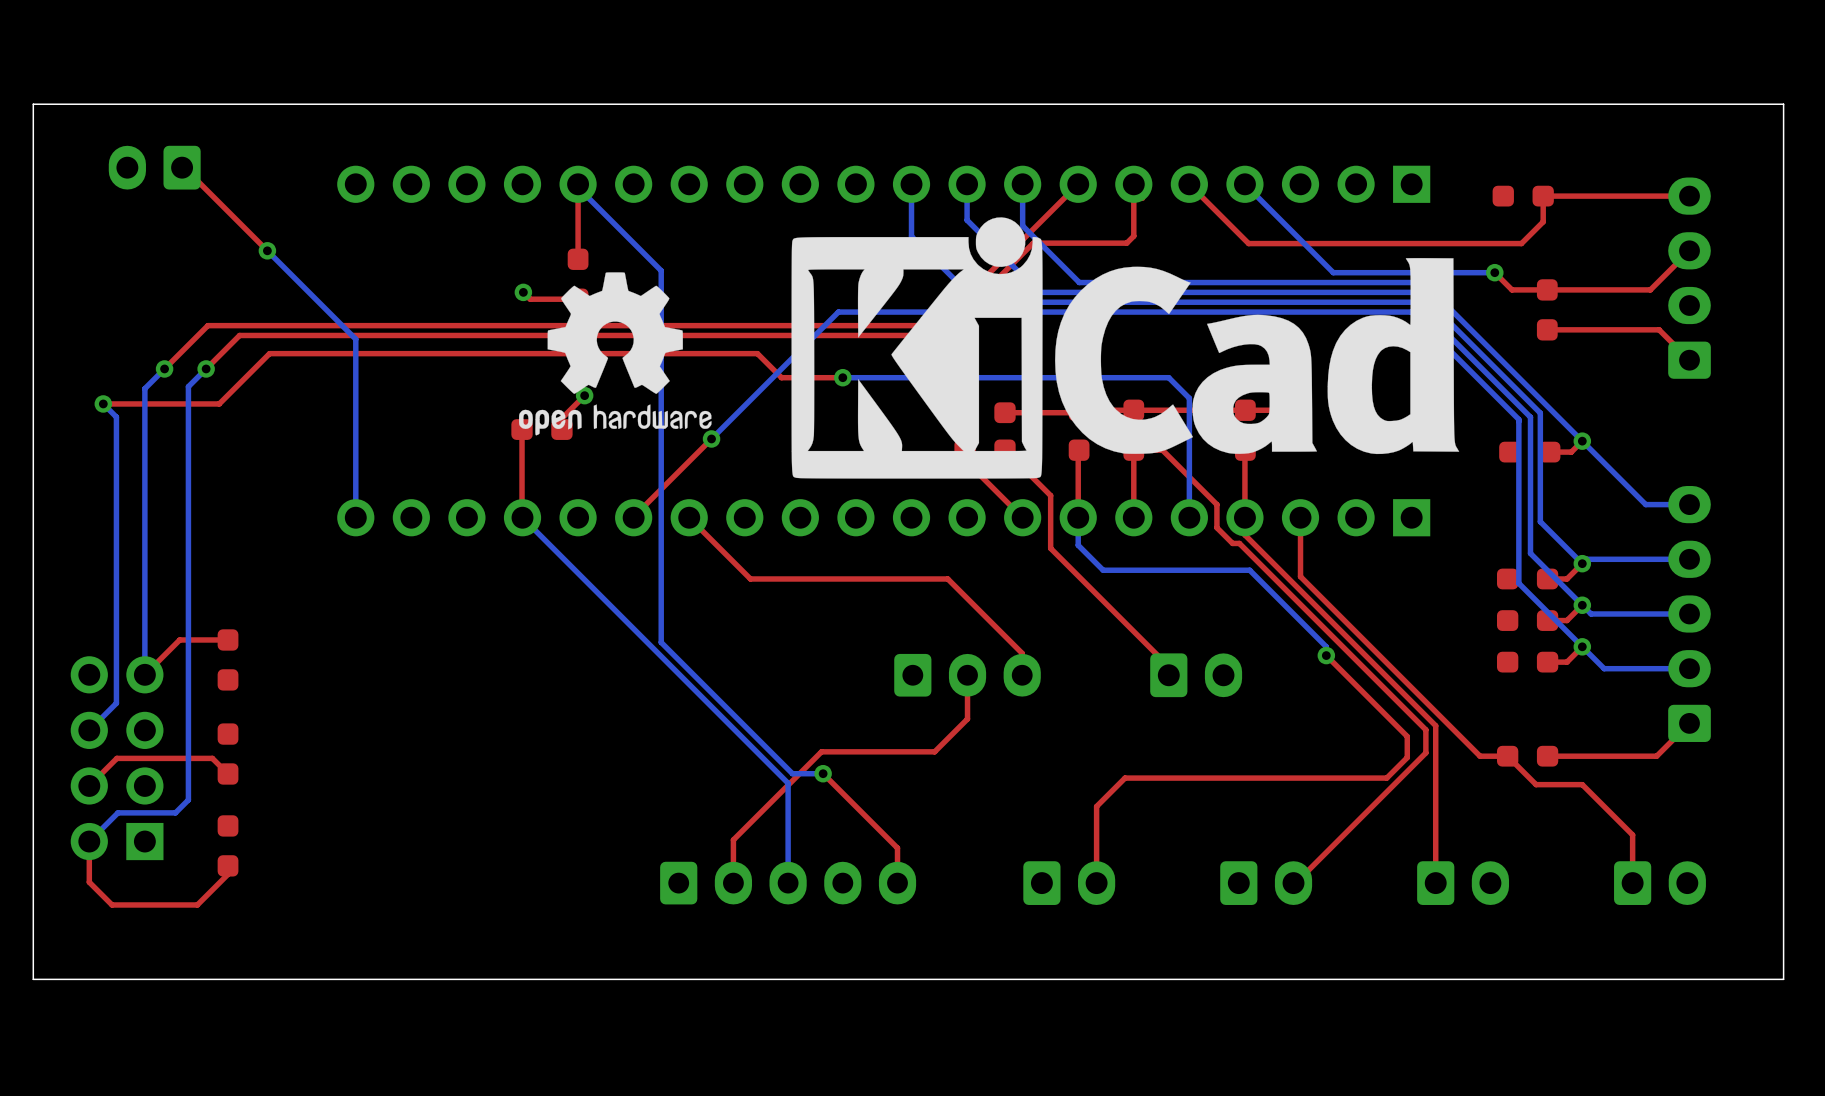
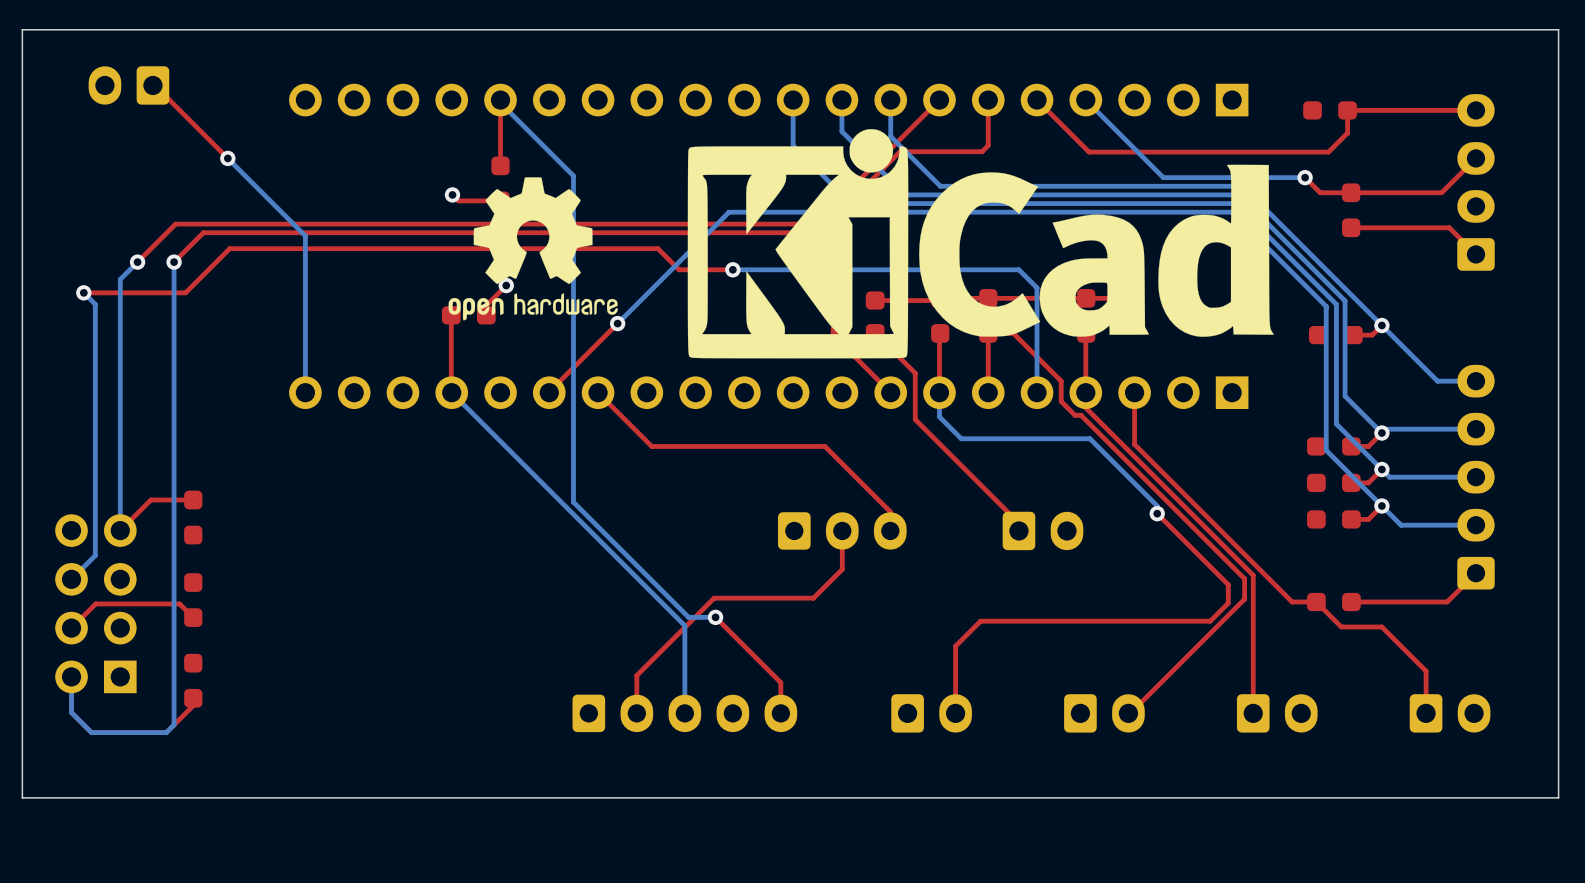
bottom track: (206, 368) (188, 386) (188, 799) (175, 812) (117, 812) (89, 841) -> (174, 262) (174, 724) (166, 732) (91, 732) (71, 712) (71, 676)

